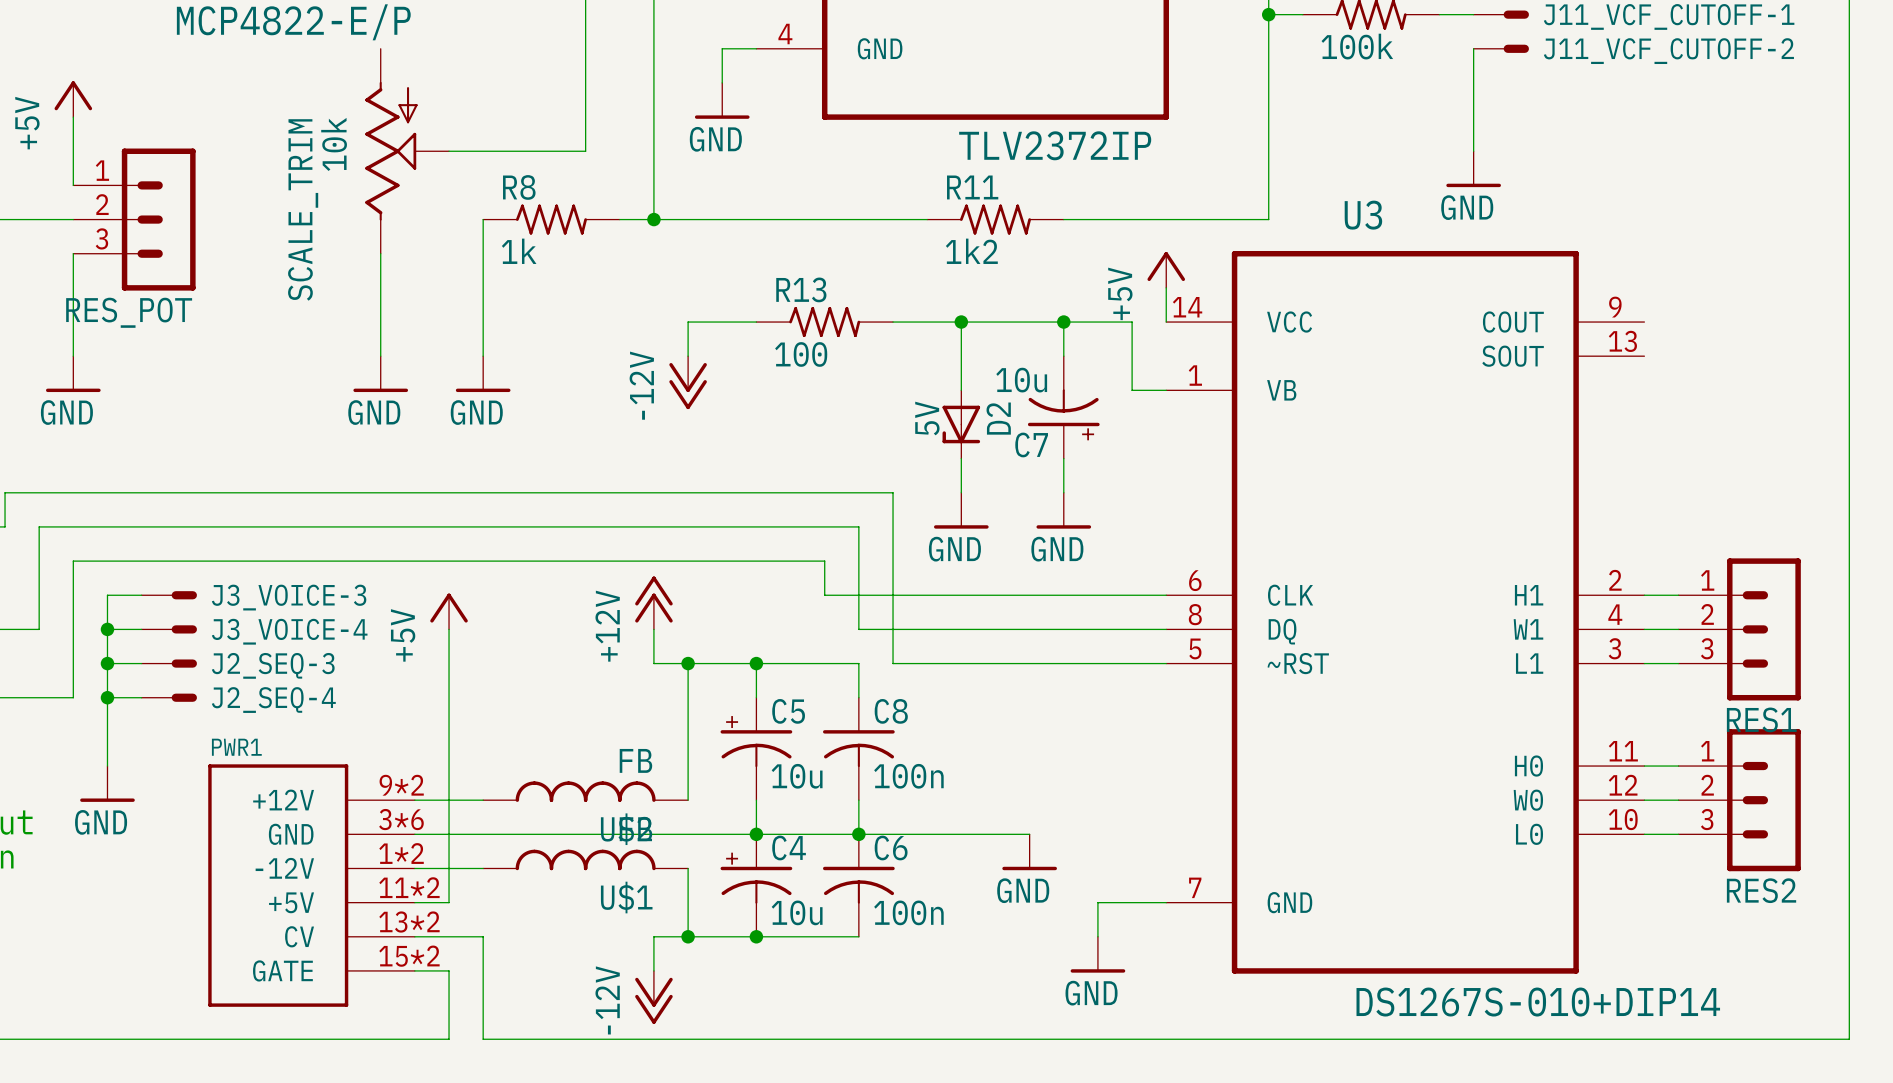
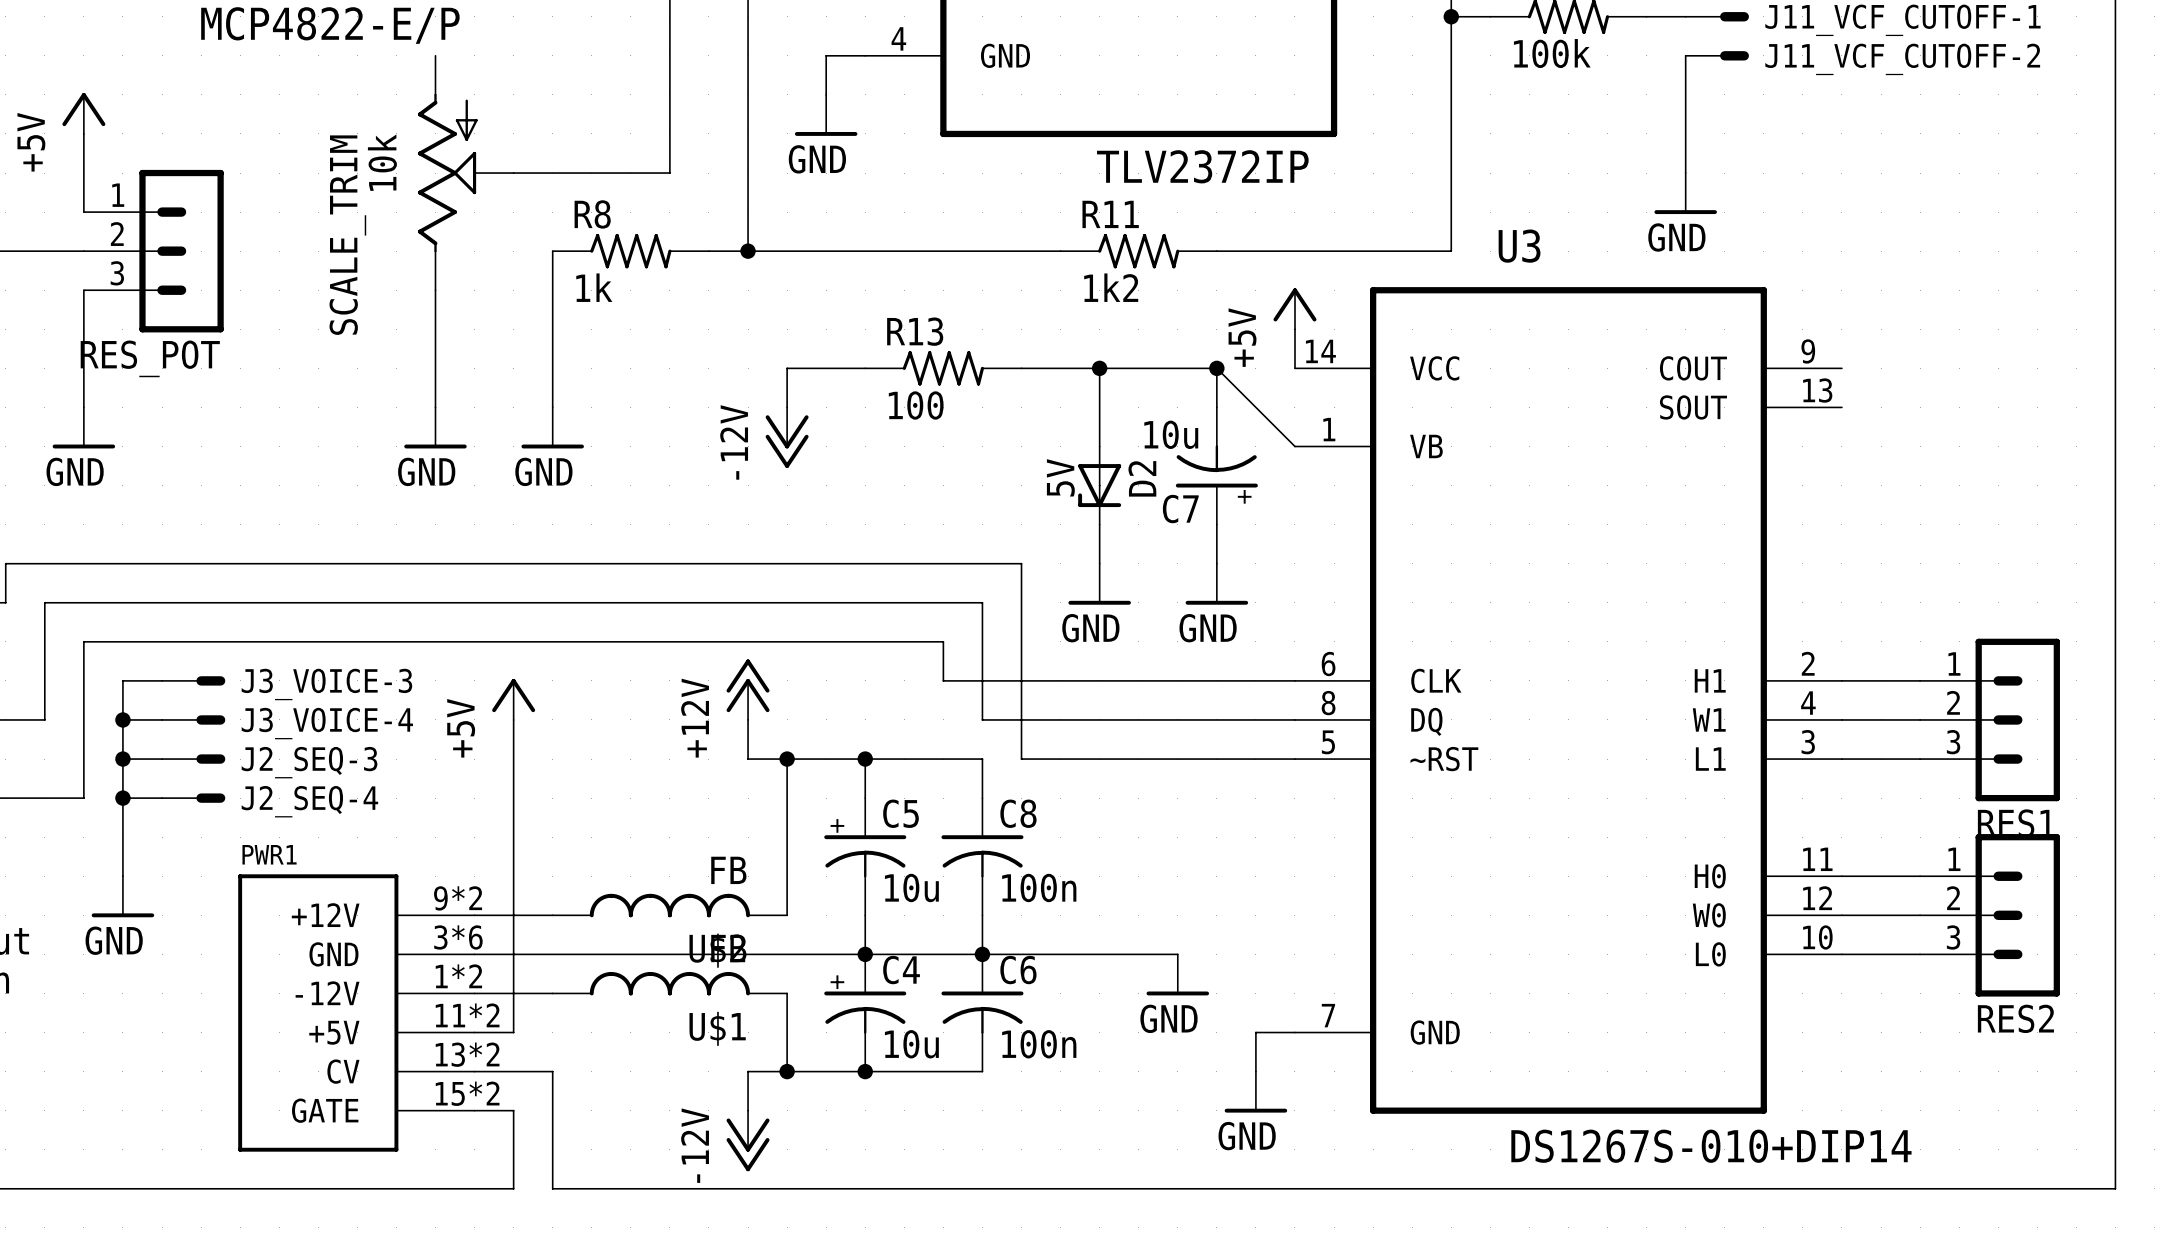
power symbol position: +5V (1166, 269) -> +5V (1294, 308)
wire: (1166, 287) (1166, 322) -> (1294, 329) (1294, 368)
wire: (1063, 322) (1132, 322) (1132, 390) (1166, 390) -> (1216, 368) (1294, 446)
U3 position: (1405, 612) -> (1568, 700)

